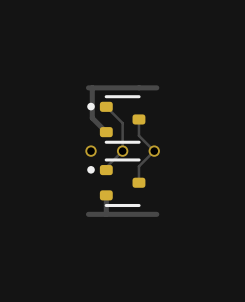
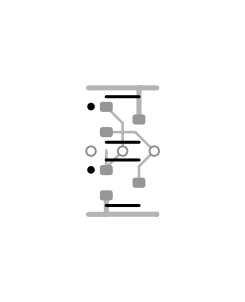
track: (92, 87) (92, 118) (106, 132) -> none
track: none -> (138, 87) (138, 119)
track: (138, 119) (138, 135) -> (106, 132) (135, 132) (138, 135)
track: none -> (106, 150) (106, 167)

